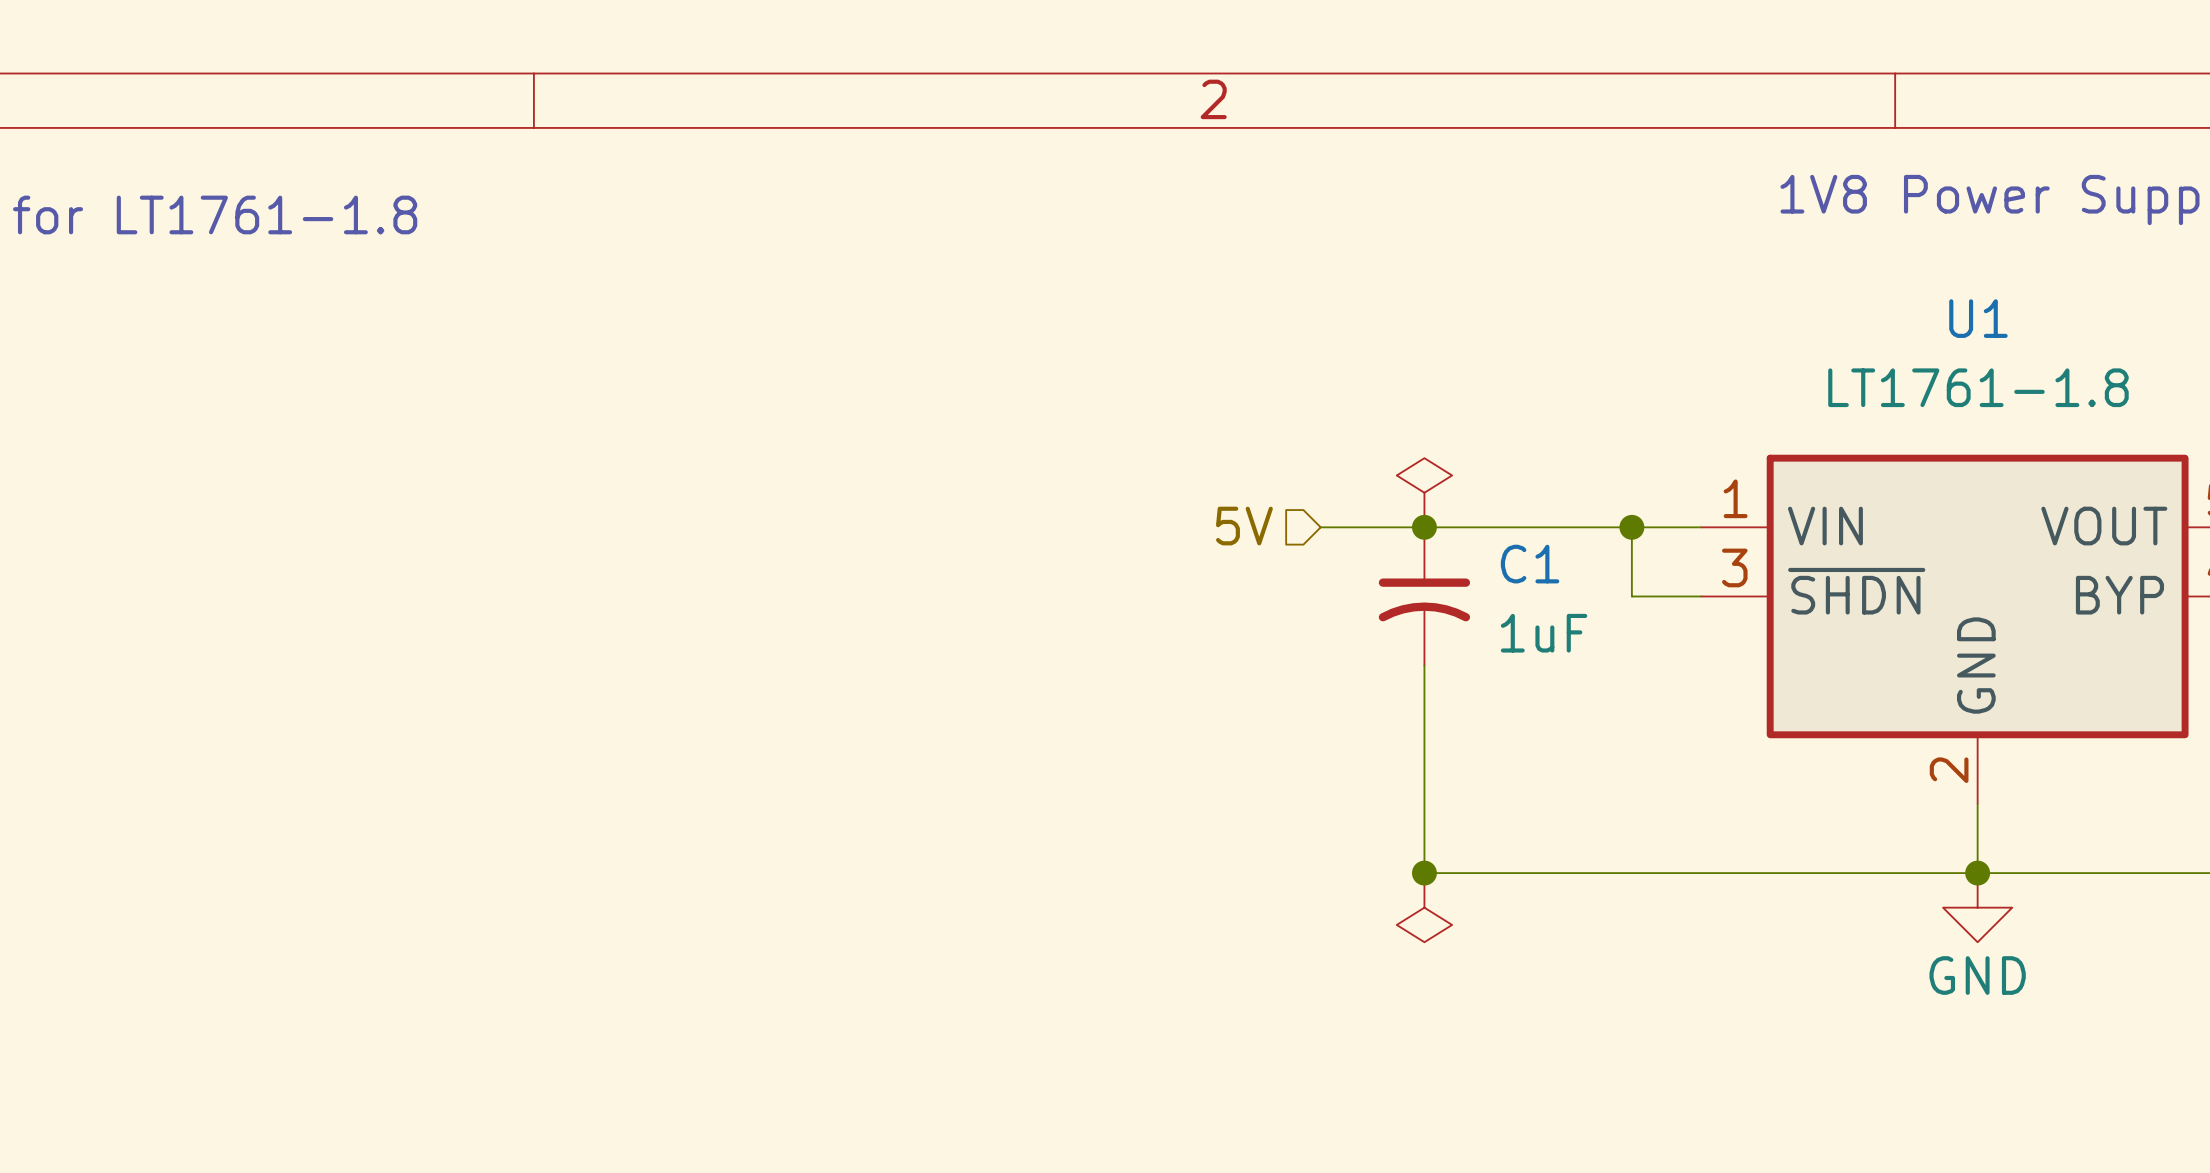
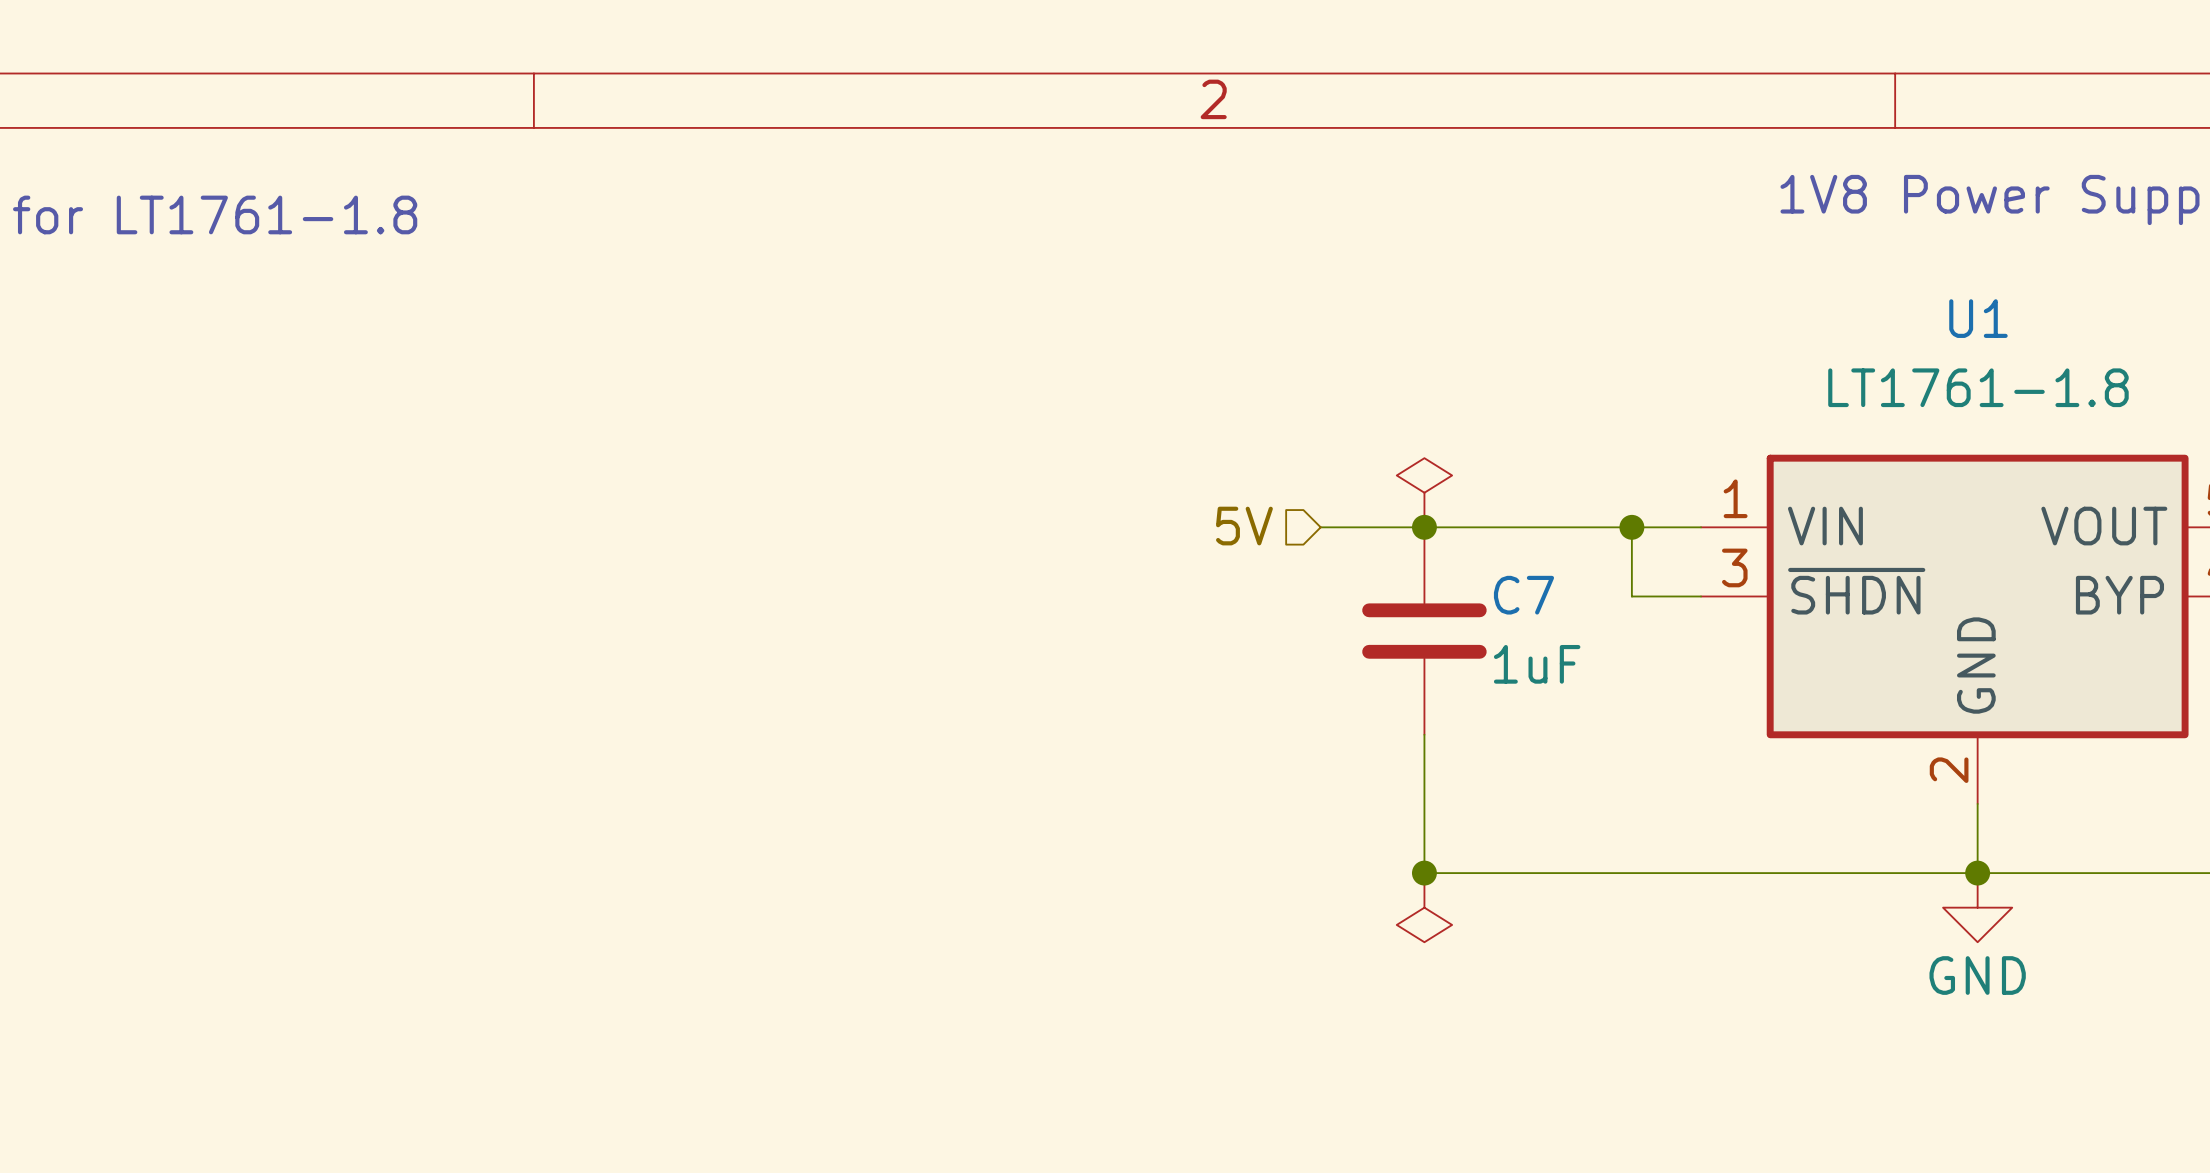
C1: 1uF (1424, 596) -> none
C7: none -> 1uF (1424, 631)

